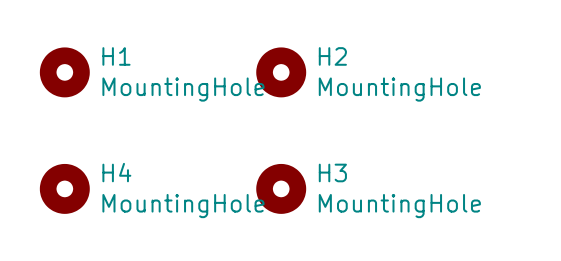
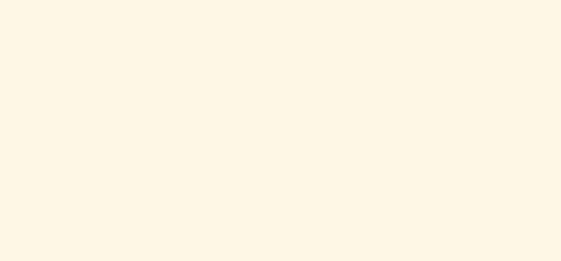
H1: MountingHole (64, 72) -> none
H2: MountingHole (281, 72) -> none
H4: MountingHole (64, 188) -> none
H3: MountingHole (281, 188) -> none

